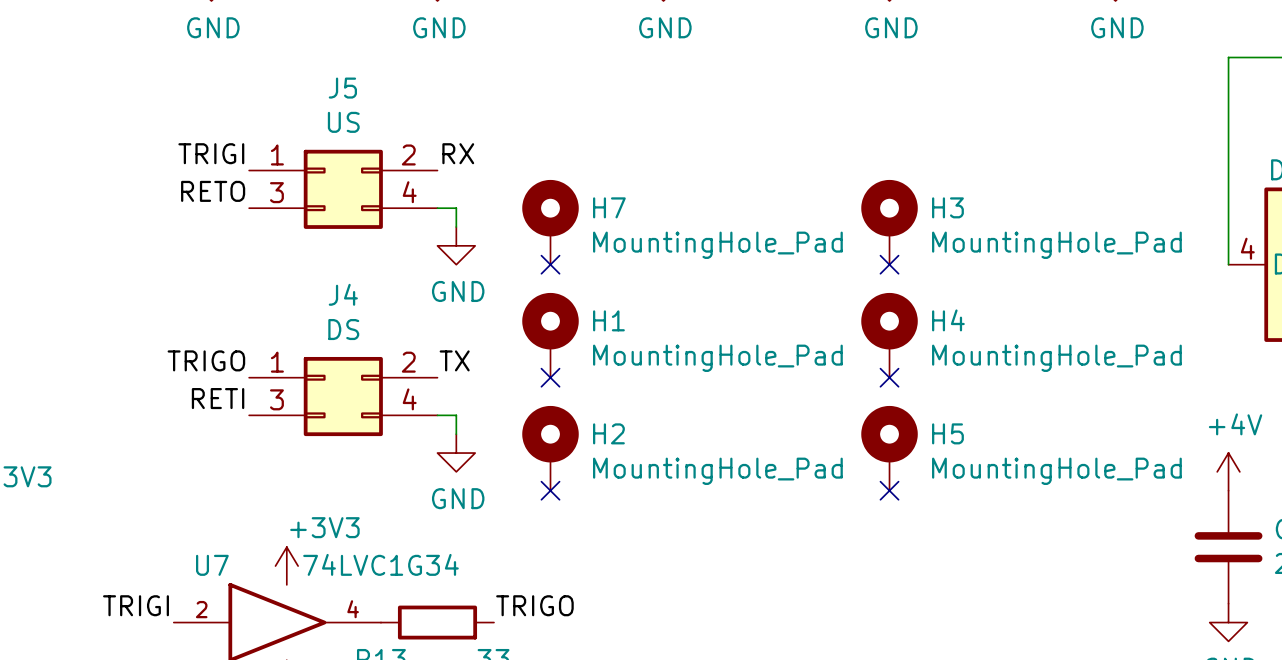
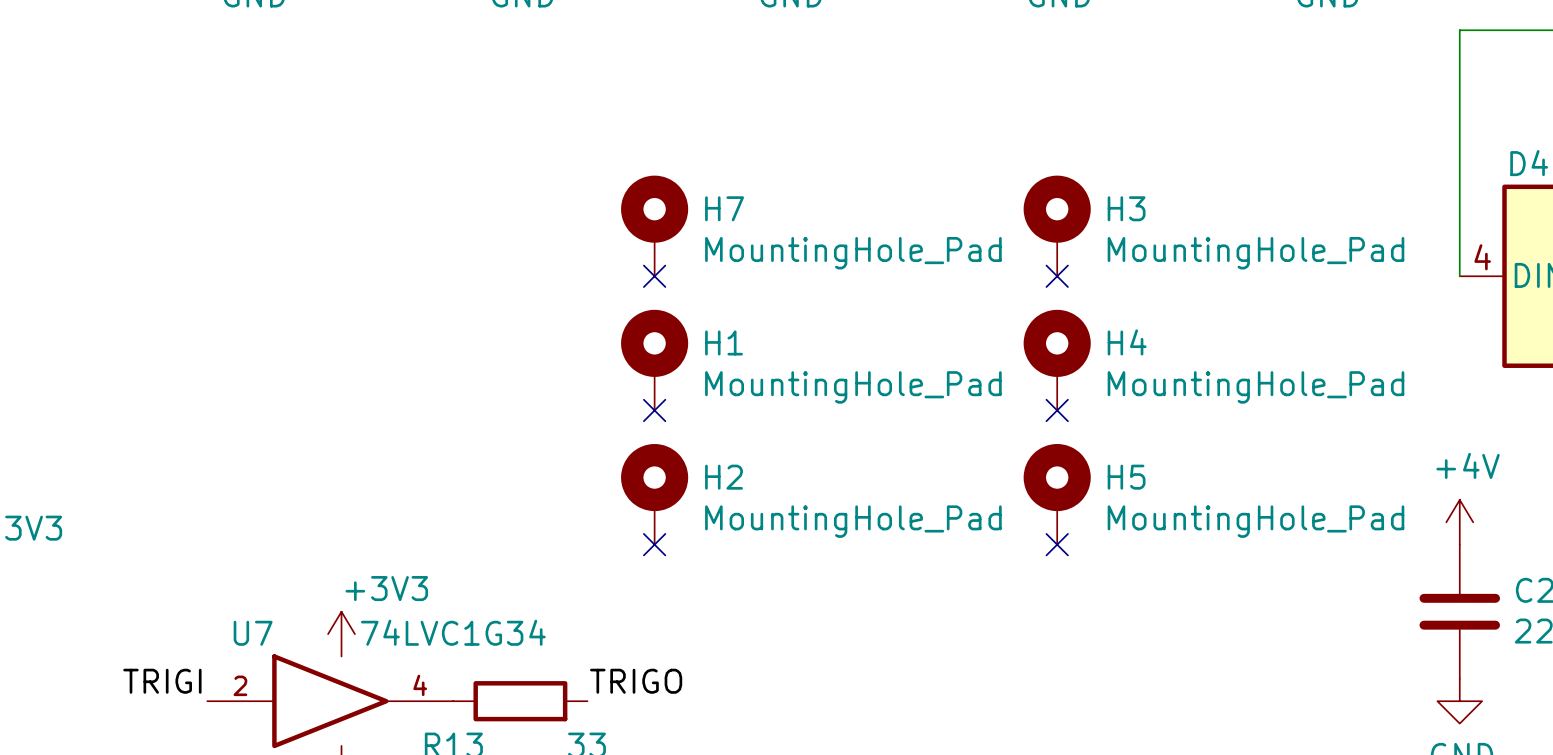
label: TRIGI (211, 153) -> none
label: RX (458, 153) -> none
J5: US (343, 189) -> none
label: RETO (213, 191) -> none
wire: (437, 208) (456, 208) (456, 227) -> none
power symbol: GND (456, 245) -> none
label: TRIGO (206, 360) -> none
label: TX (454, 360) -> none
J4: DS (343, 396) -> none
label: RETI (218, 398) -> none
wire: (437, 415) (456, 415) (456, 434) -> none
power symbol: GND (456, 453) -> none

